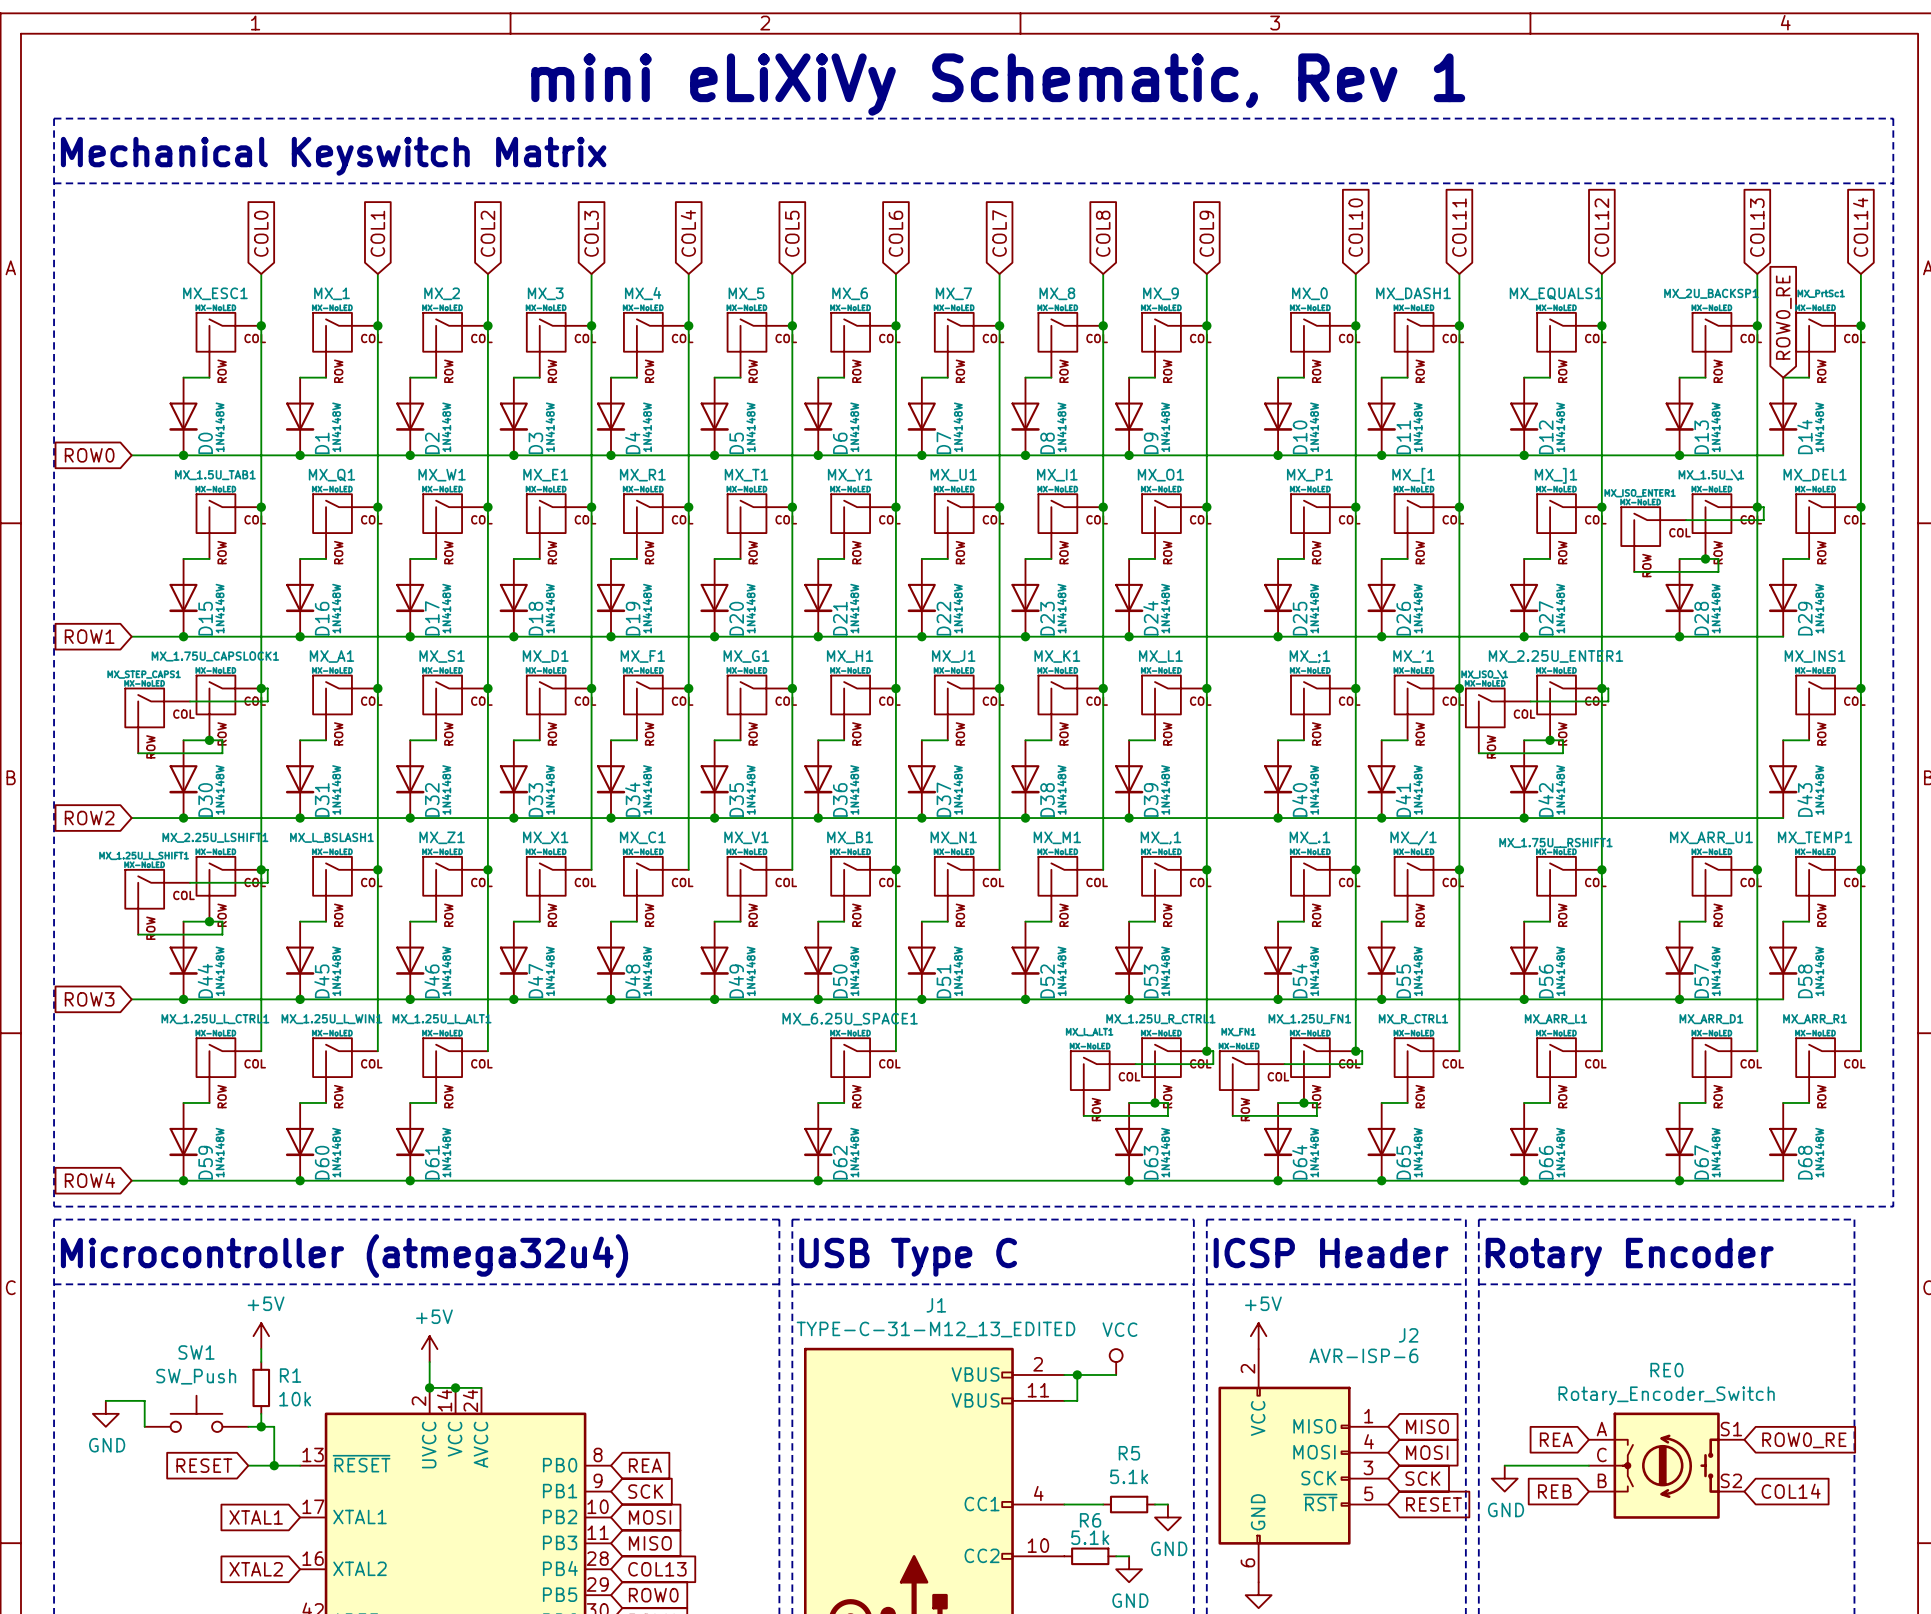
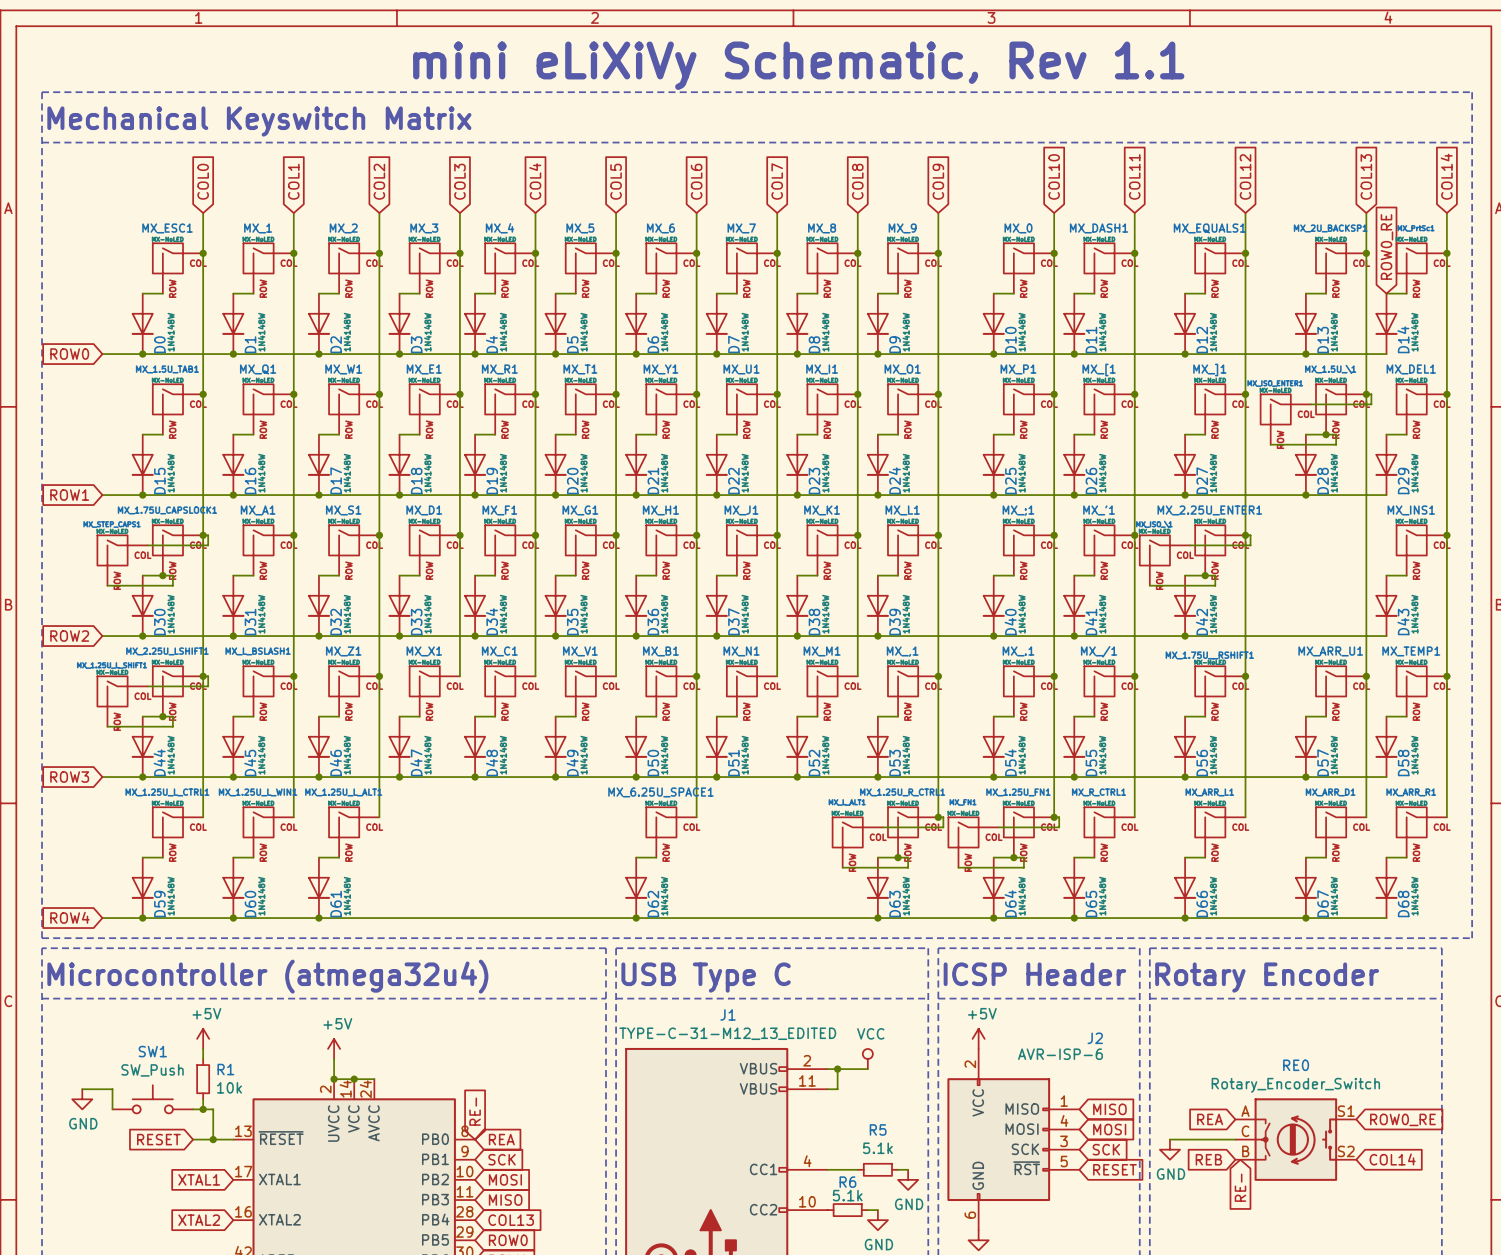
text: mini eLiXiVy Schematic, Rev 1 (998, 84) -> mini eLiXiVy Schematic, Rev 1.1 (798, 65)
global label: none -> RE- (475, 1111)
global label: none -> RE- (1240, 1187)

